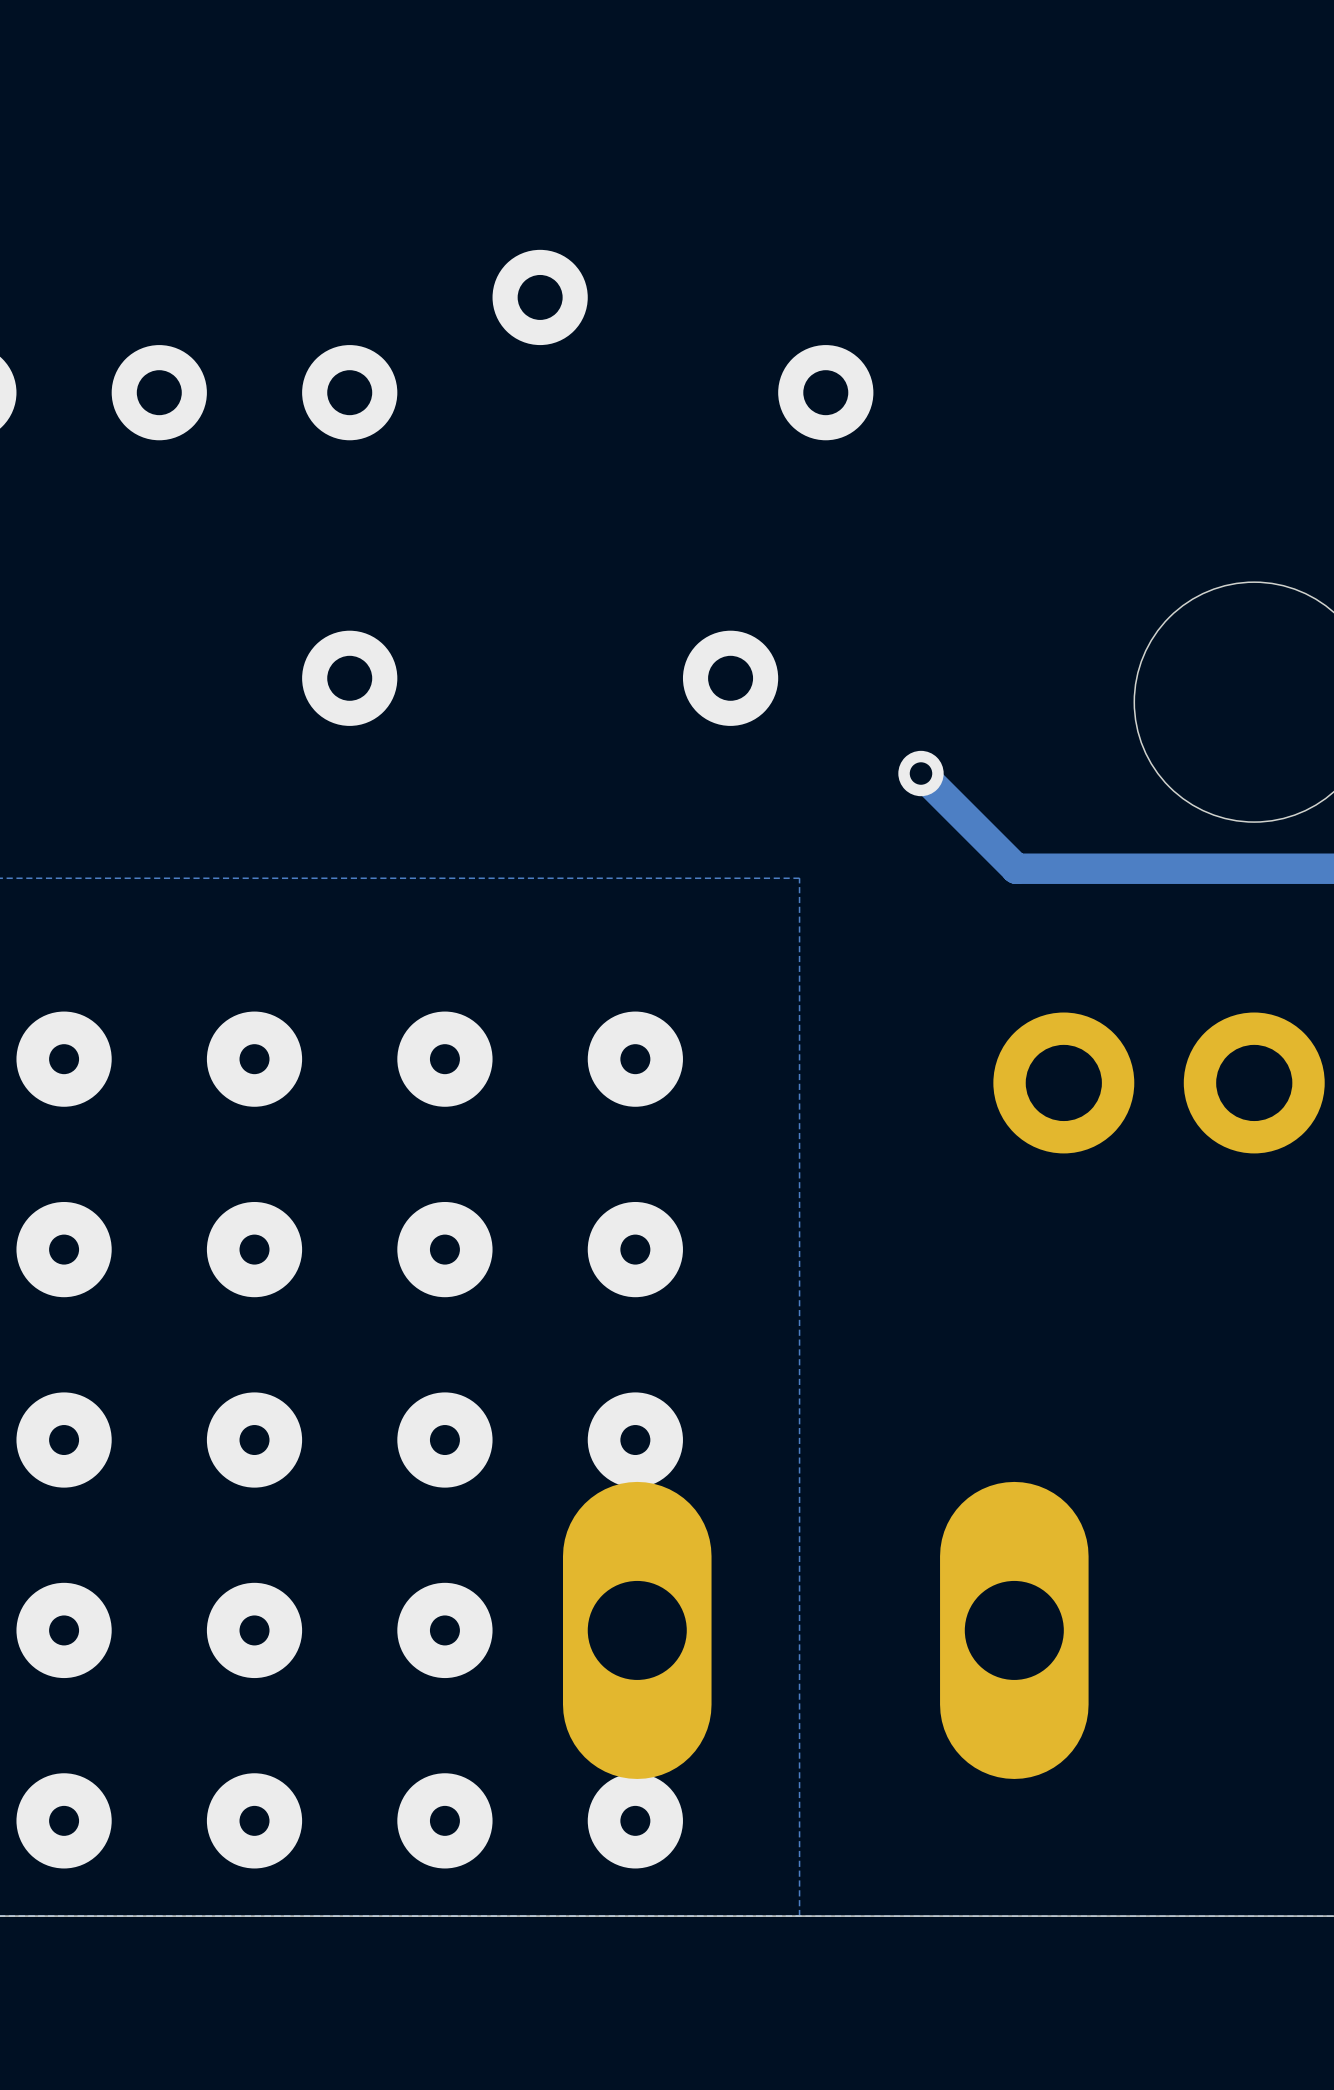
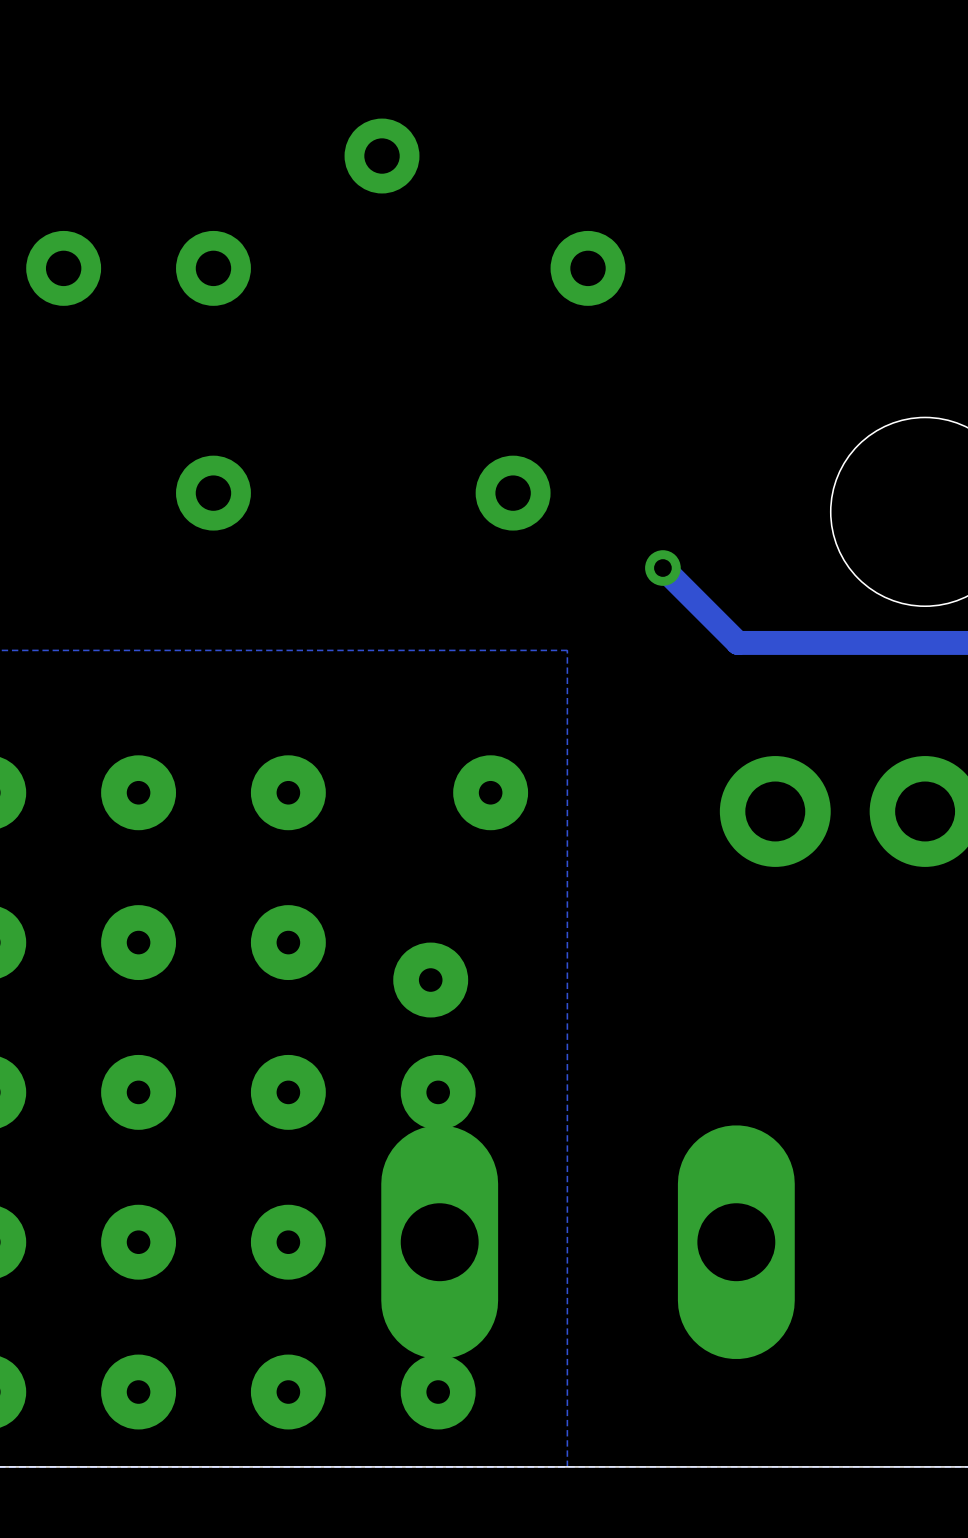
via position: (540, 297) -> (382, 156)
via position: (635, 1059) -> (490, 792)
via position: (635, 1249) -> (430, 980)

